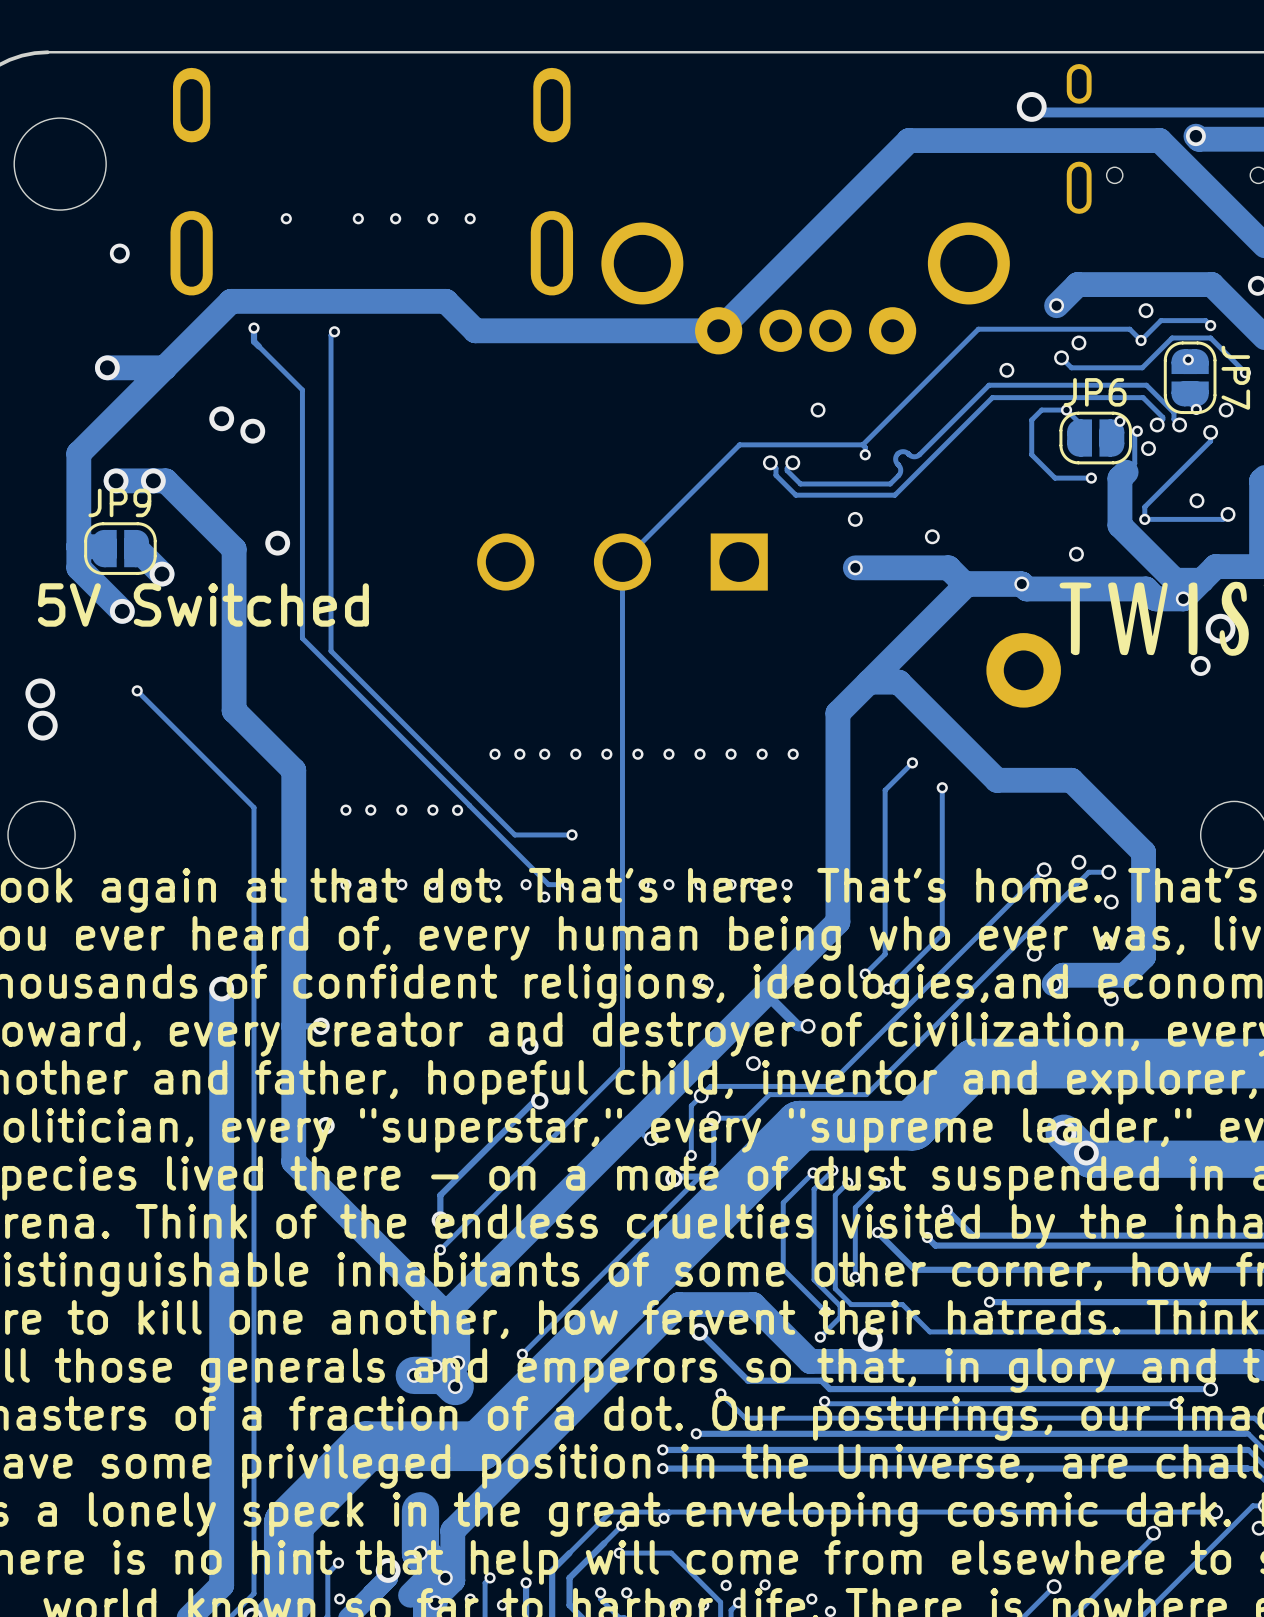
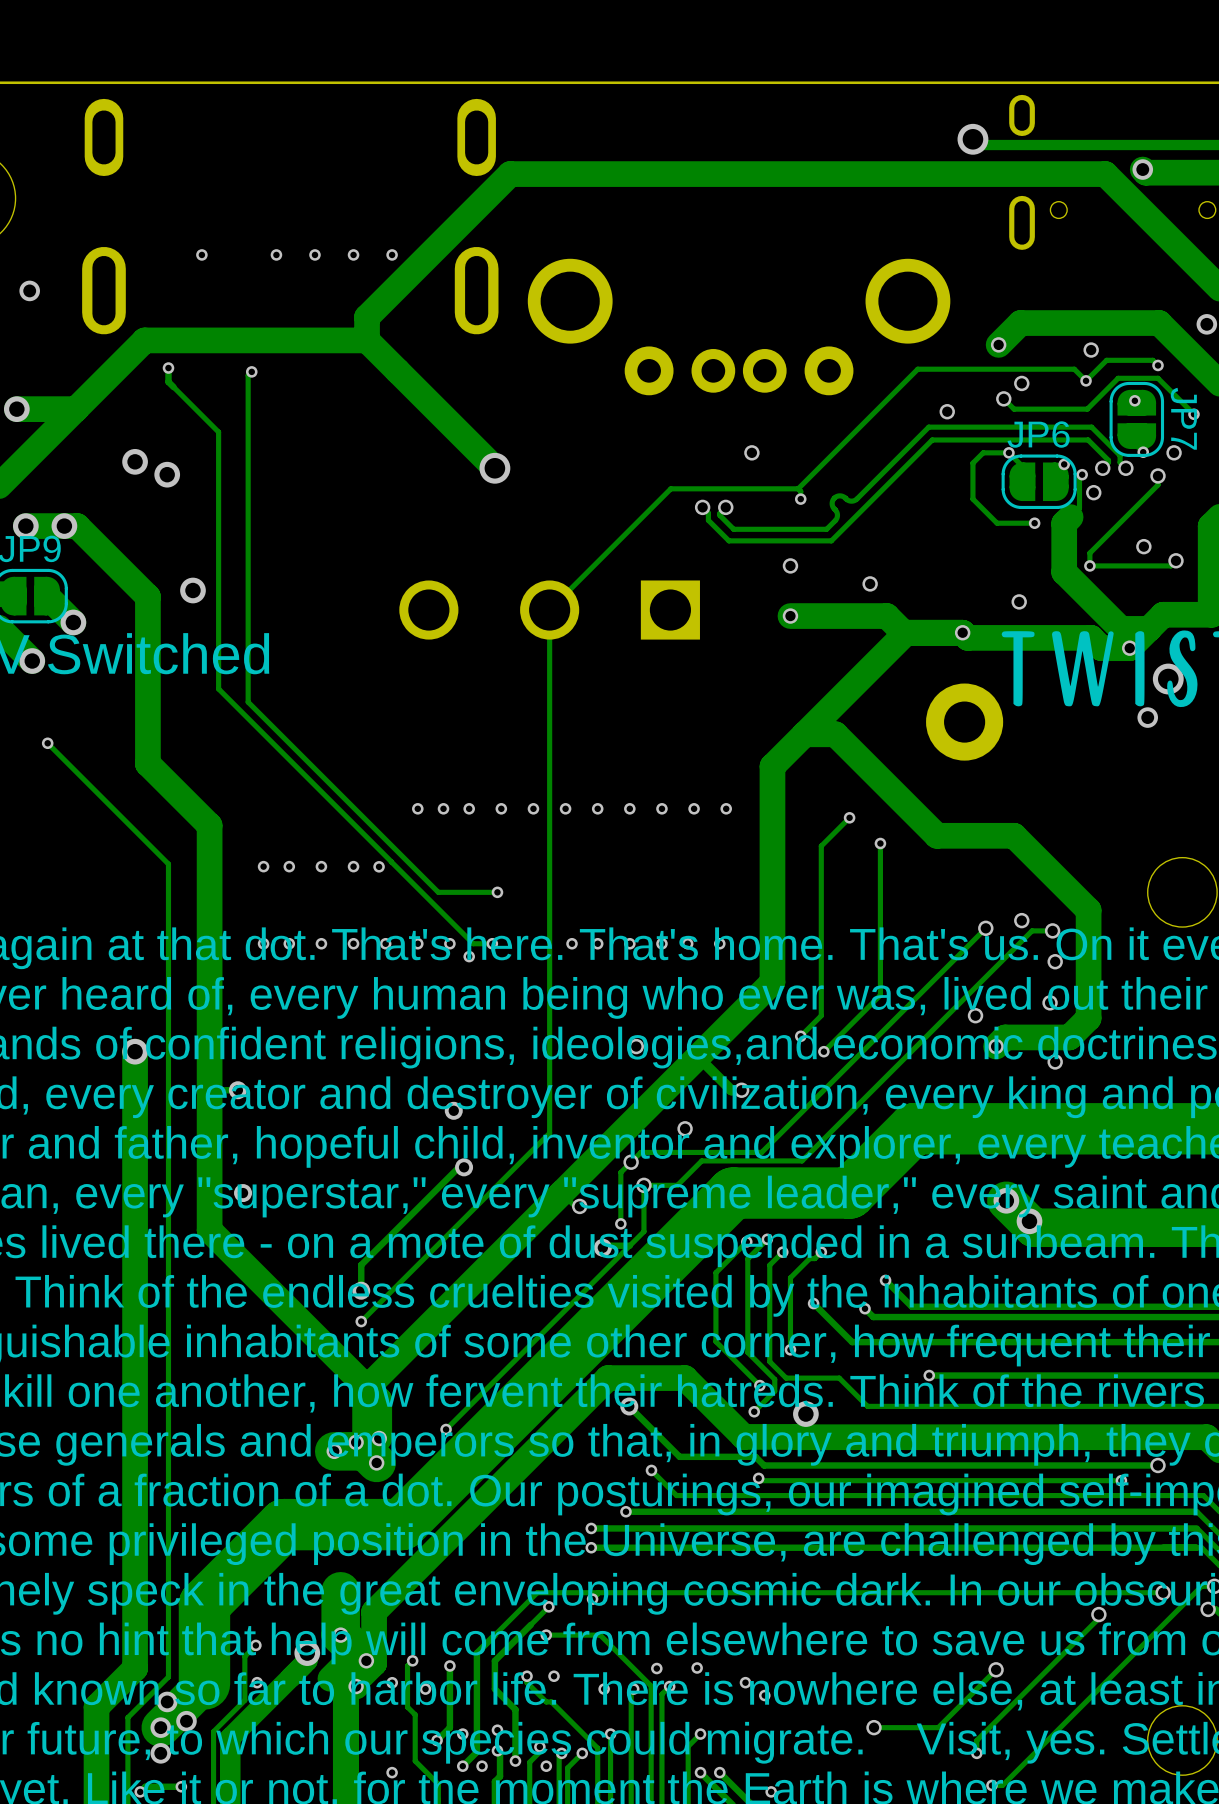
track: (908, 140) (718, 330) (475, 330) -> (845, 174) (510, 174) (367, 317) (367, 340)
track: none -> (397, 370) (494, 468)
via: none -> (494, 468)

